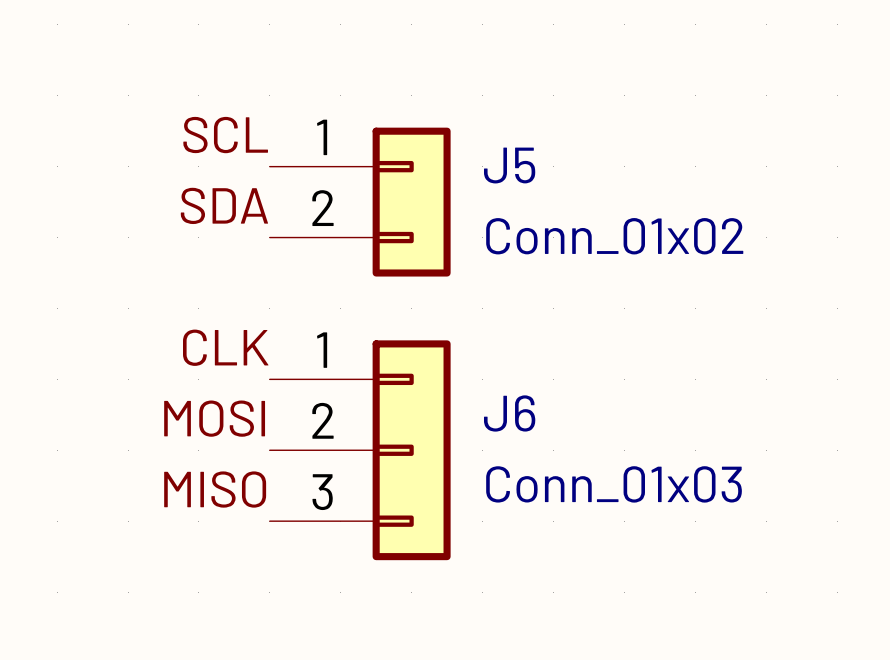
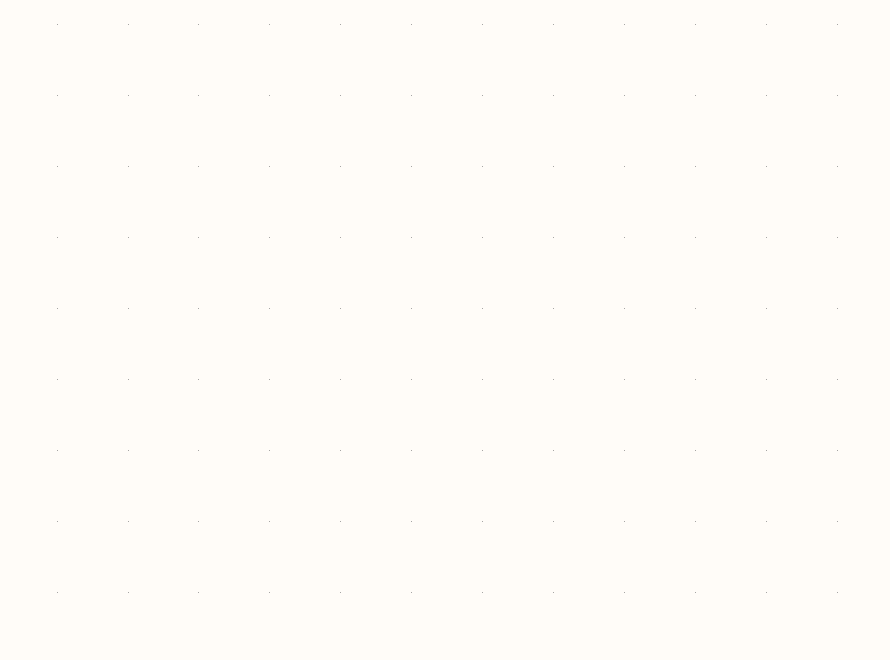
label: SCL (225, 135) -> none
J5: Conn_01x02 (360, 202) -> none
label: SDA (224, 205) -> none
label: CLK (225, 347) -> none
label: MOSI (214, 418) -> none
J6: Conn_01x03 (360, 450) -> none
label: MISO (215, 489) -> none

